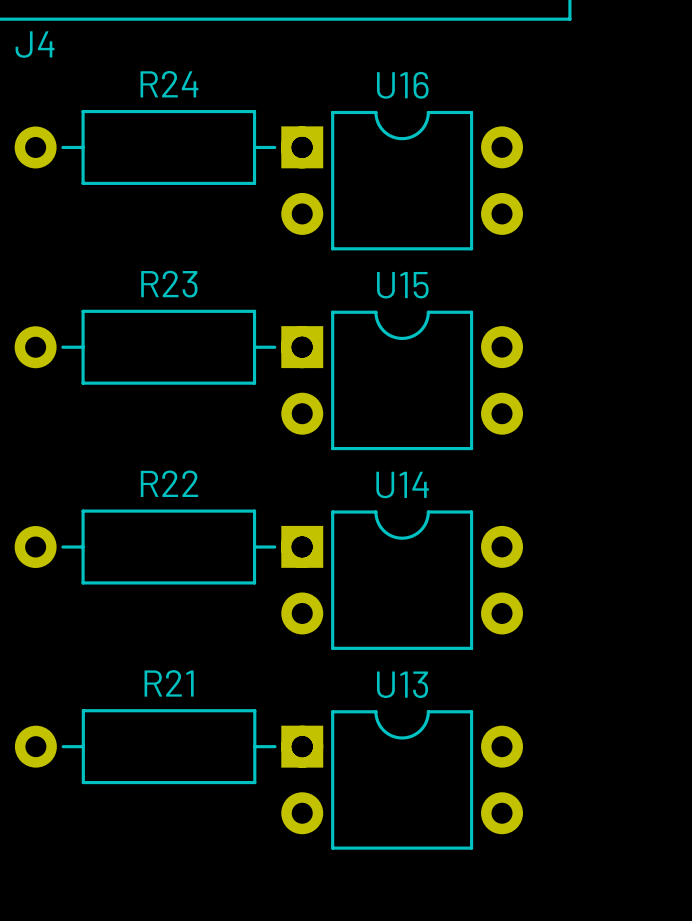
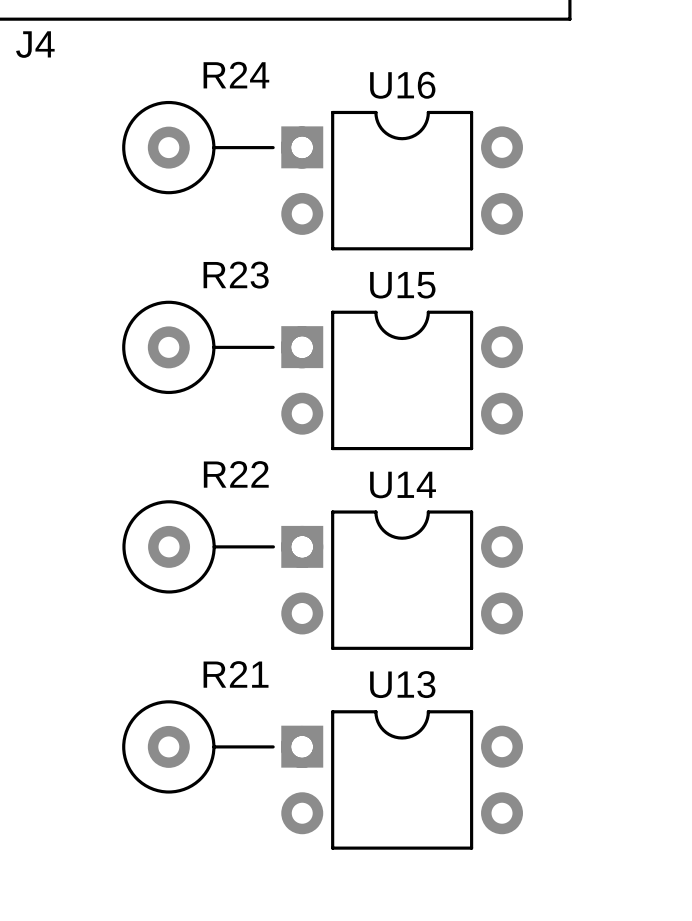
R24 footprint: [14, 109, 323, 185] -> [122, 100, 323, 195]
R23 footprint: [14, 309, 323, 385] -> [122, 300, 323, 395]
R22 footprint: [14, 509, 323, 585] -> [122, 500, 324, 594]
R21 footprint: [14, 709, 324, 785] -> [122, 700, 323, 794]

